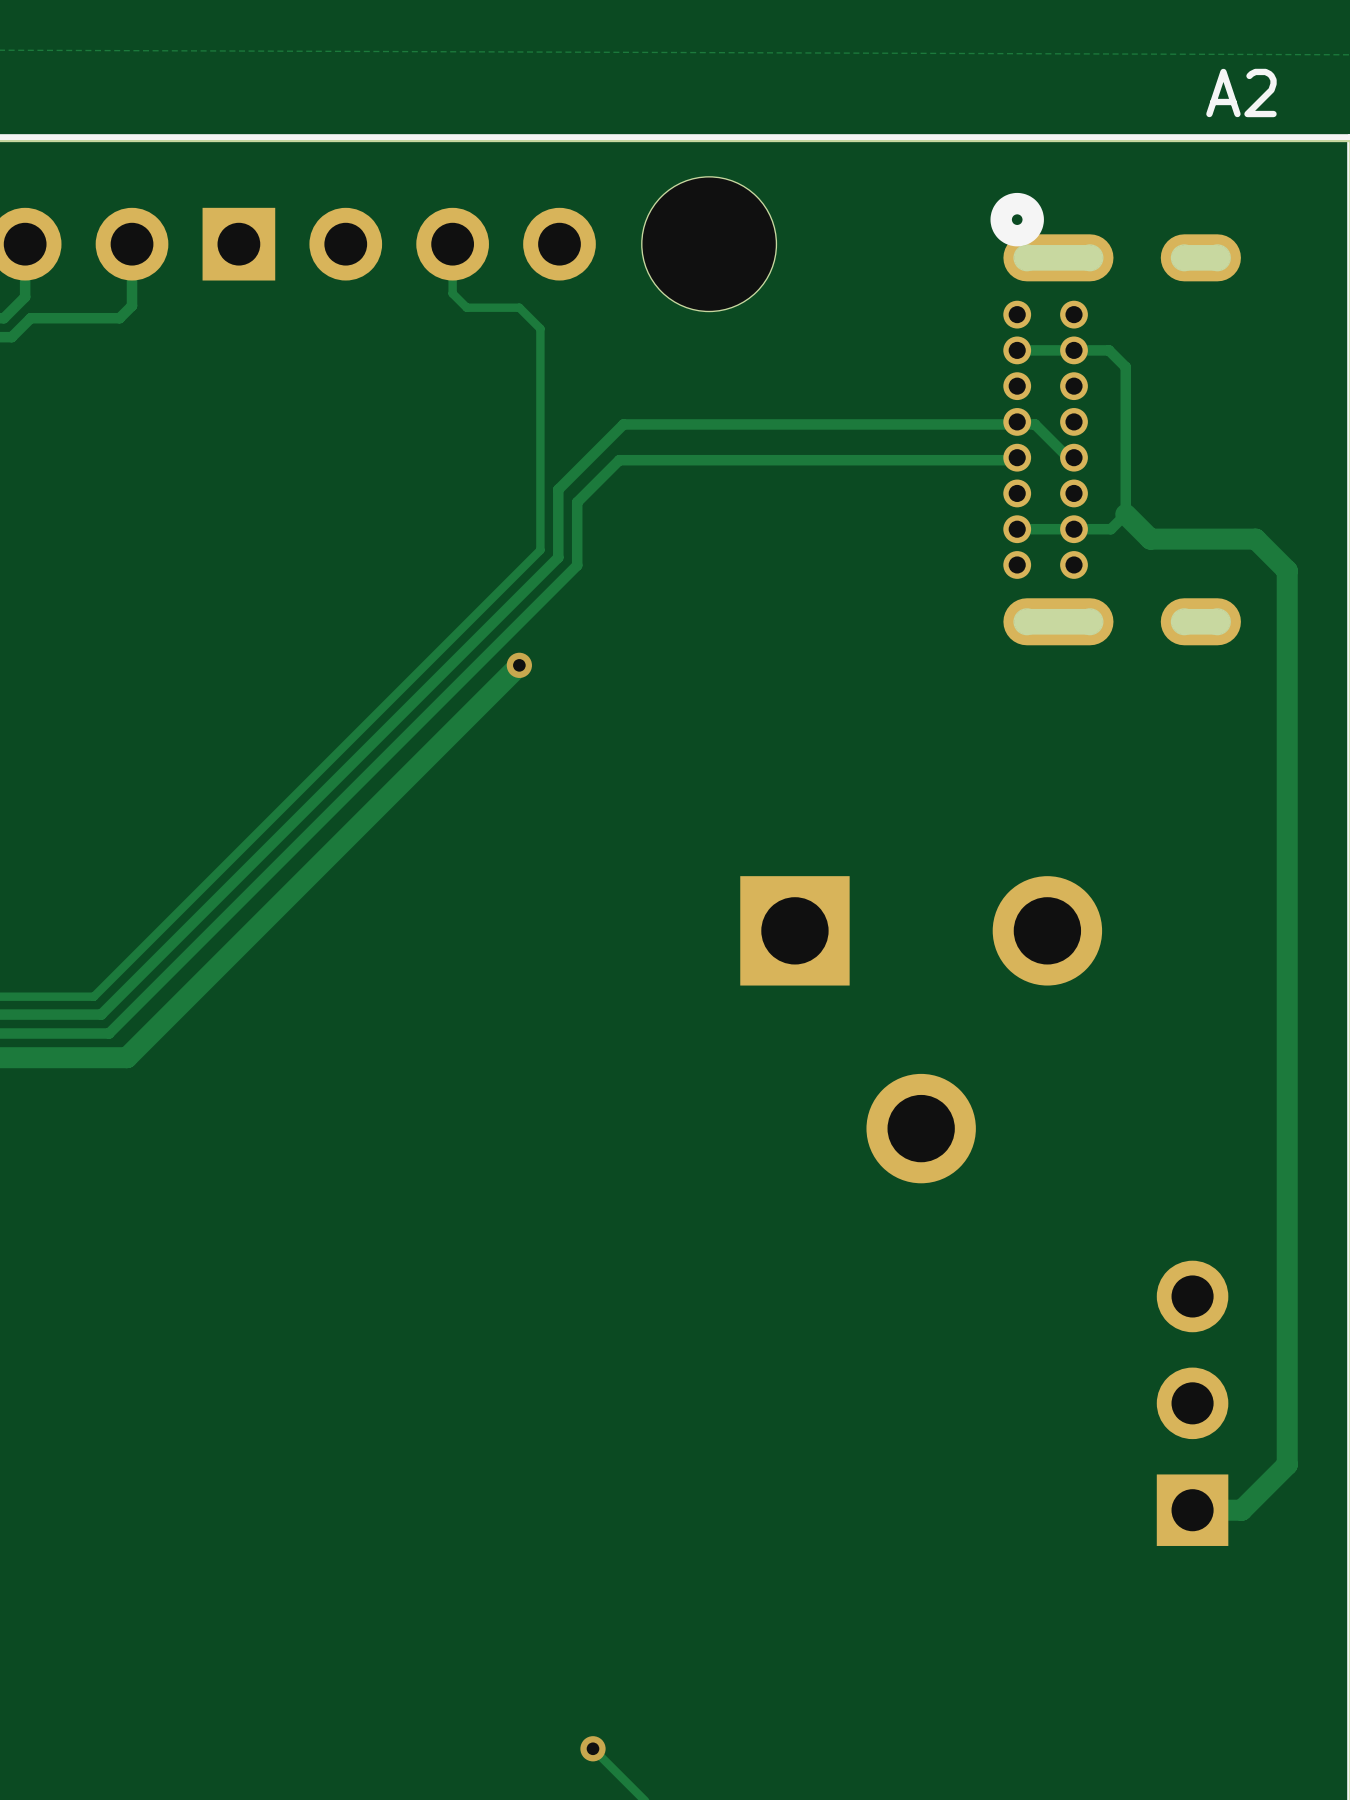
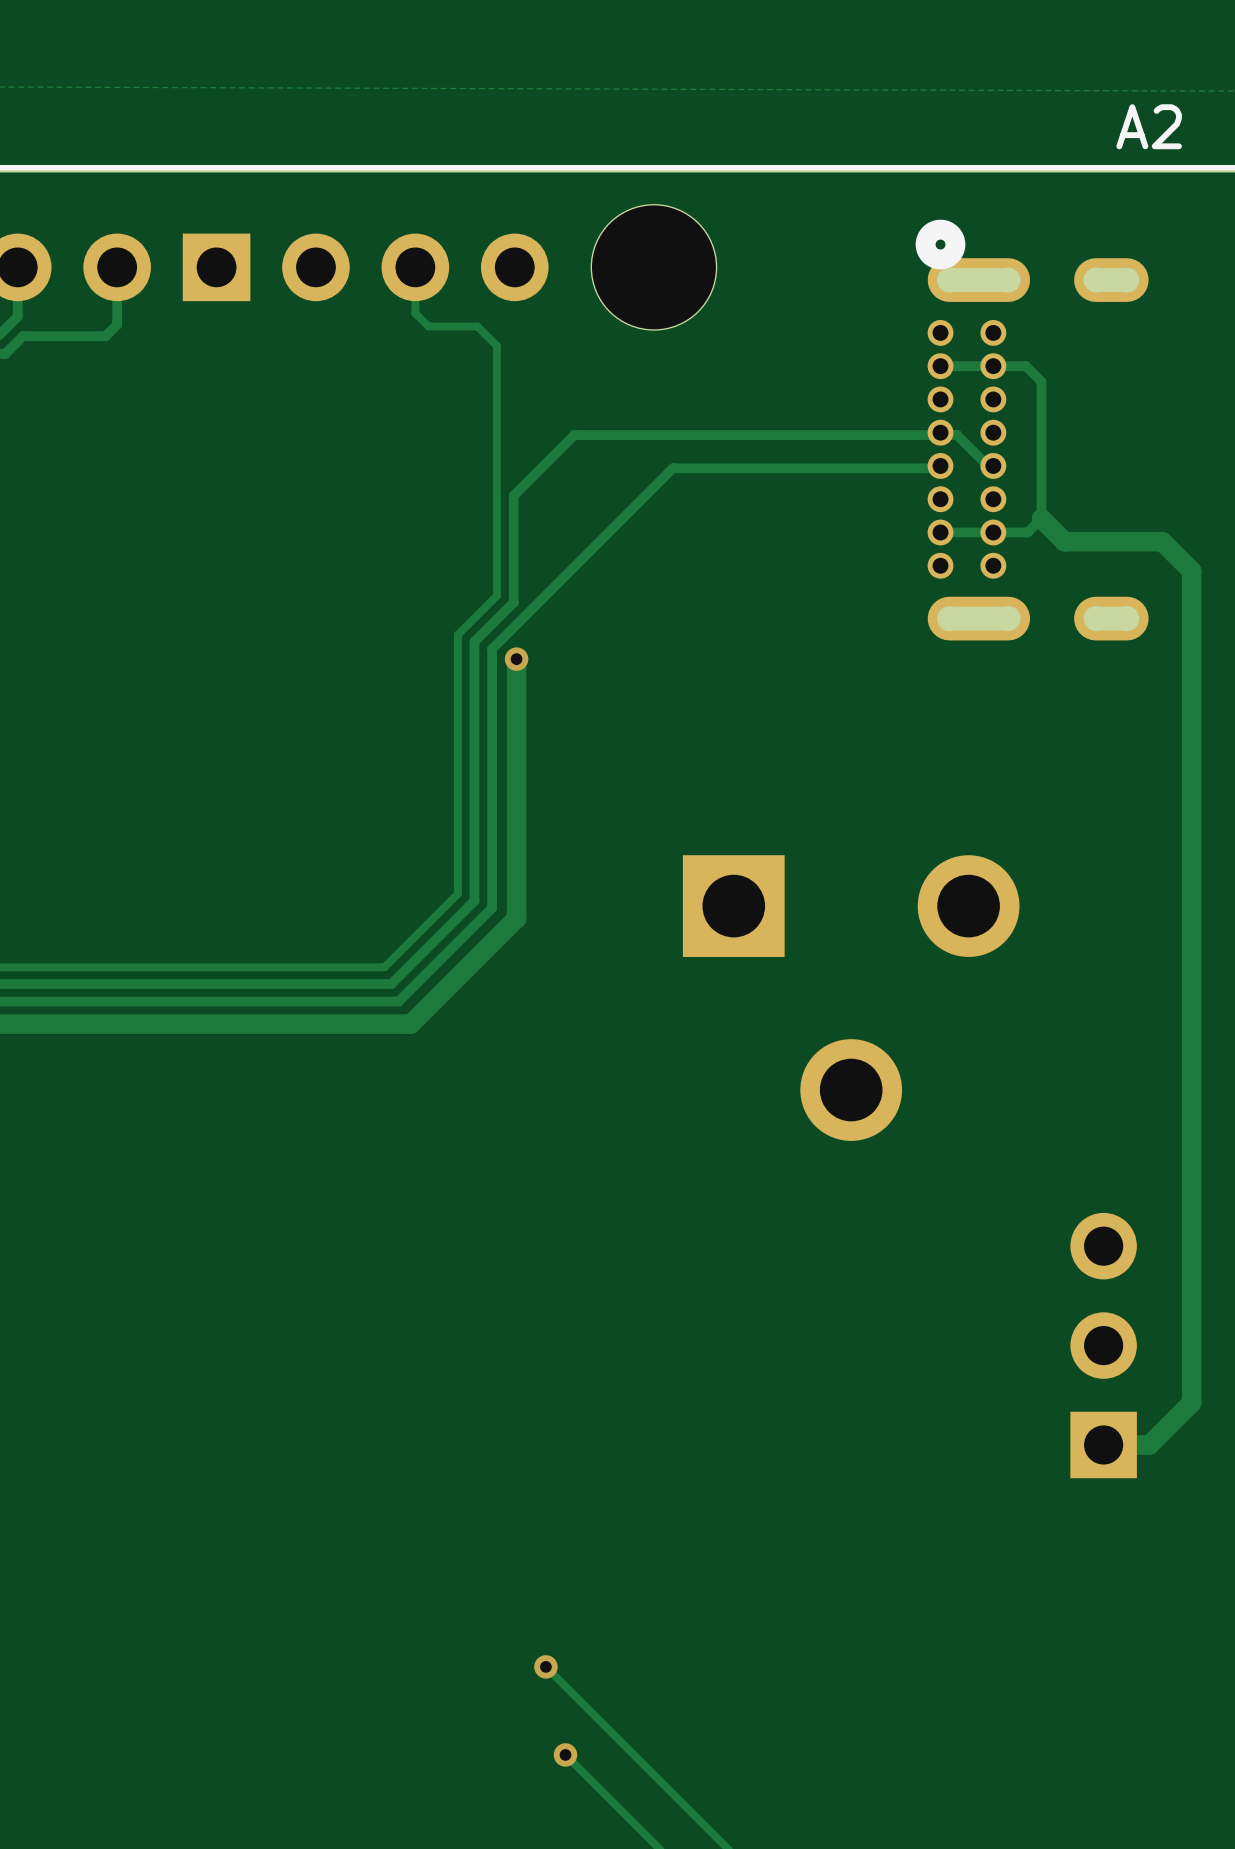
track: (729, 460) (619, 460) (577, 502) (577, 565) (109, 1033) -> (672, 468) (492, 648) (492, 908) (398, 1001) (95, 1001)
track: (540, 550) (93, 996) -> (497, 551) (497, 595) (457, 634) (457, 893) (384, 967) (81, 967)
track: (558, 557) (101, 1014) -> (513, 558) (513, 602) (474, 641) (474, 900) (391, 983) (88, 983)
track: (519, 665) (127, 1057) -> (516, 659) (516, 918) (410, 1024) (112, 1024)
via position: (519, 665) -> (516, 659)

